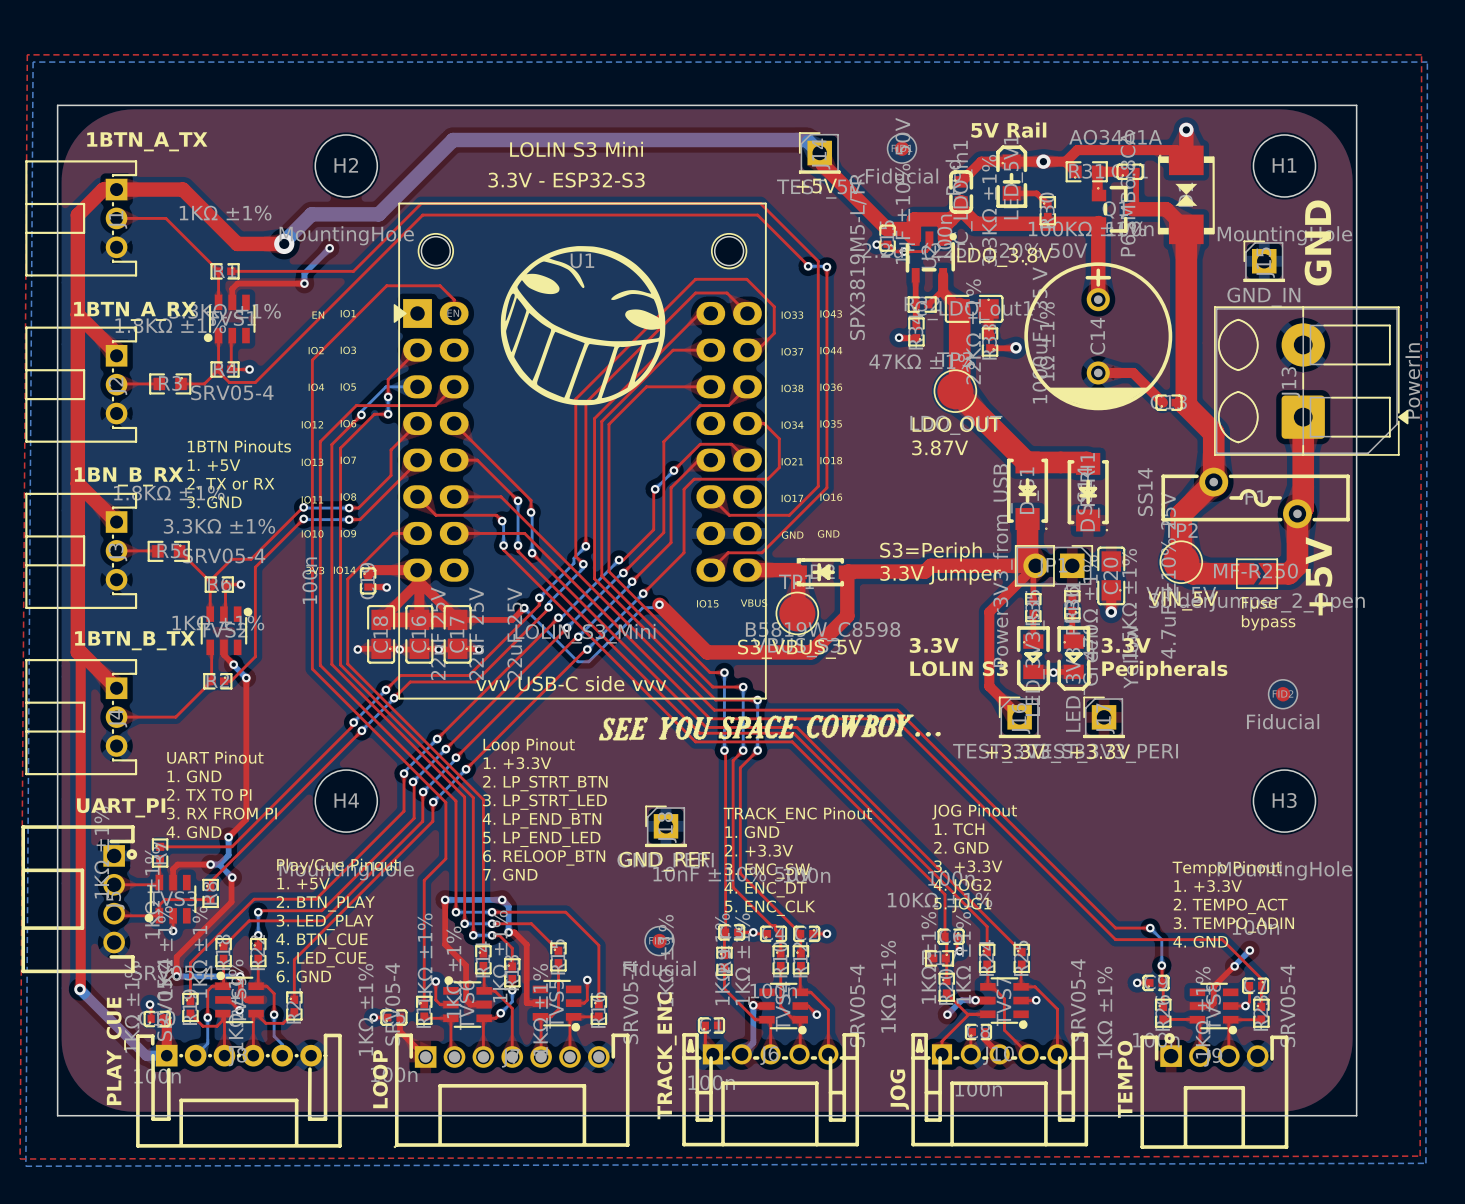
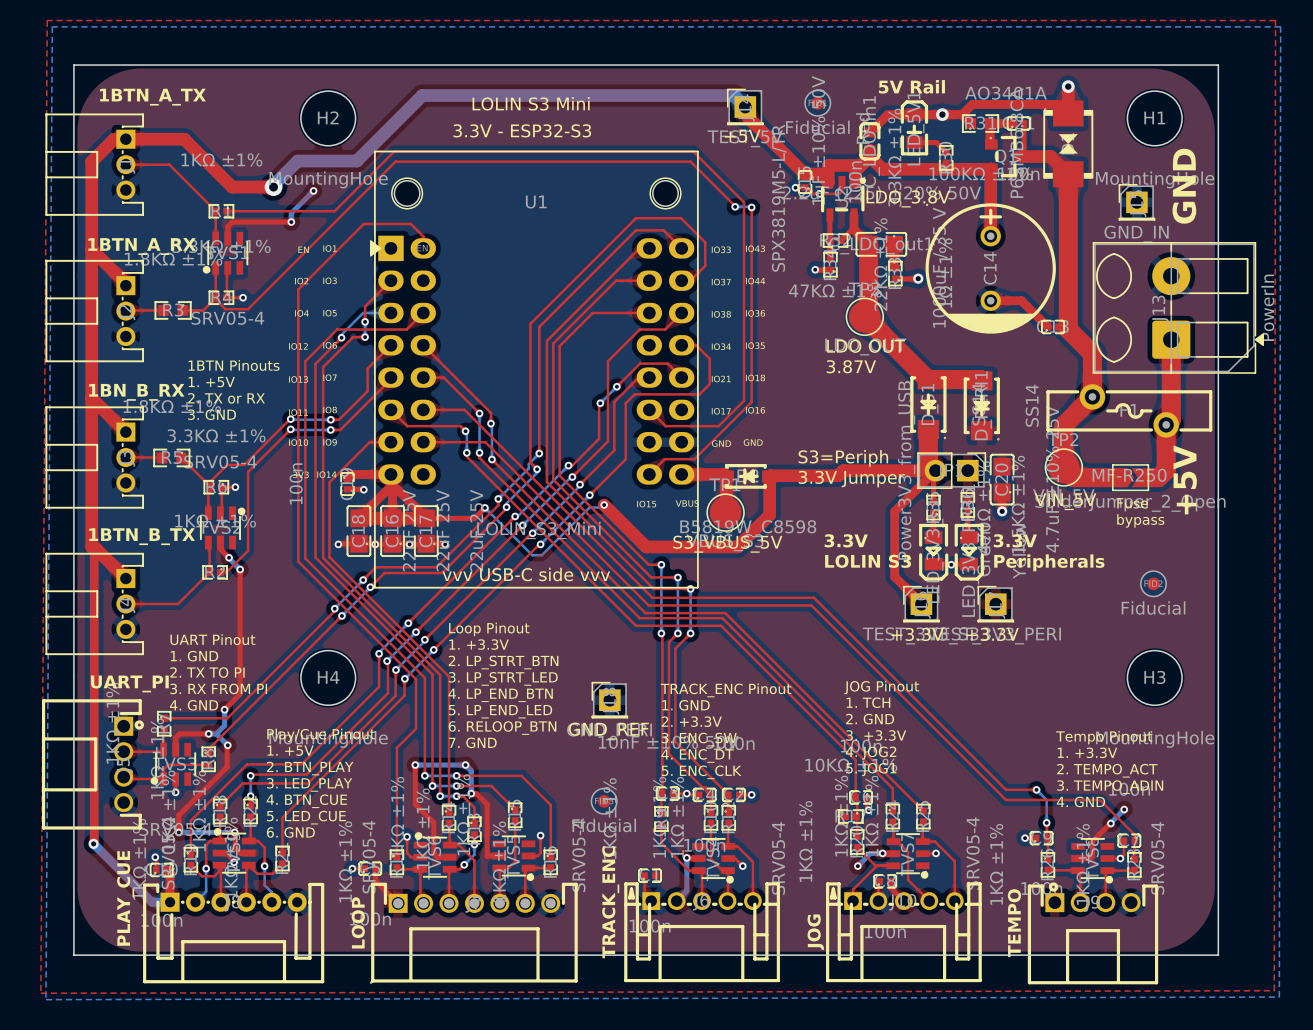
drawing: [500, 246, 666, 406] -> none
drawing: [599, 714, 941, 741] -> none

